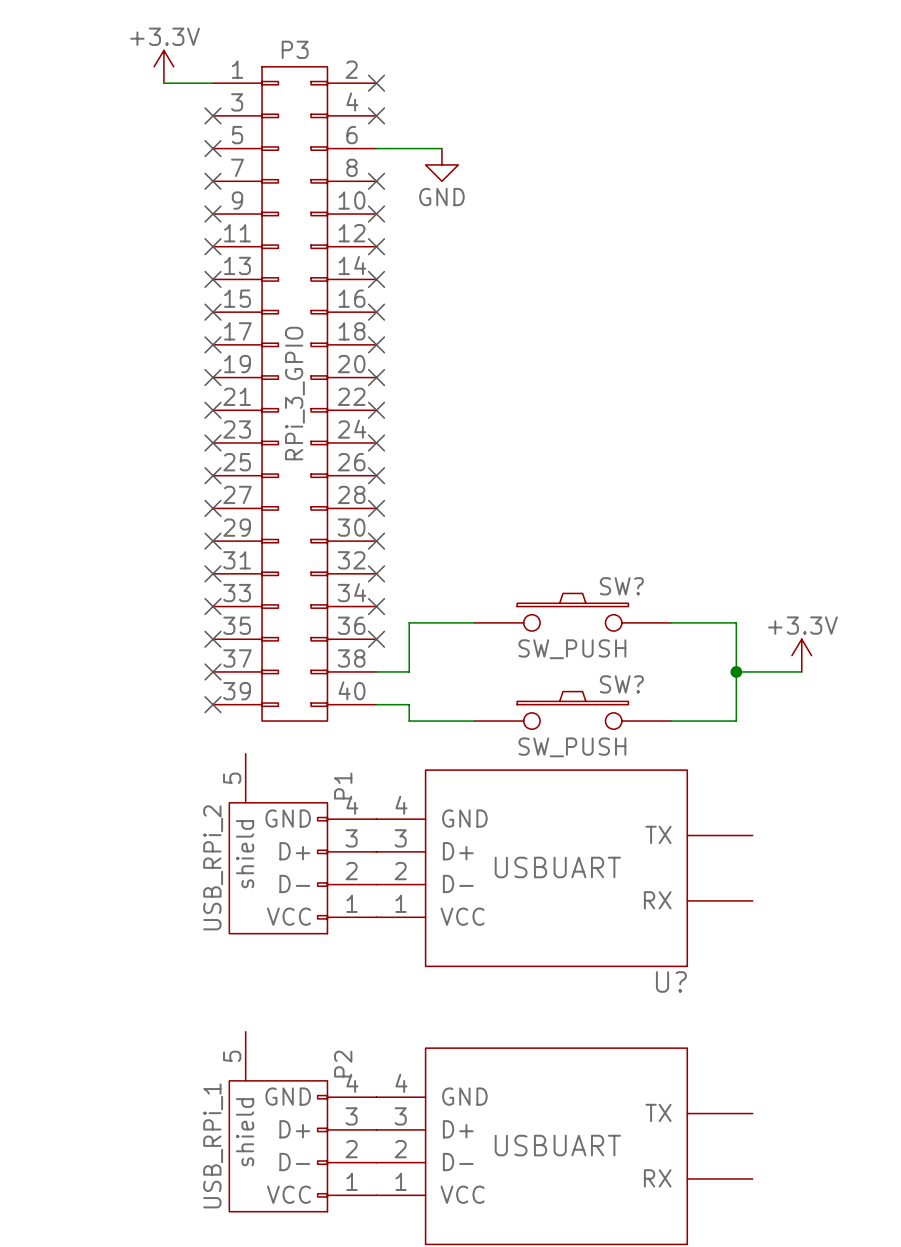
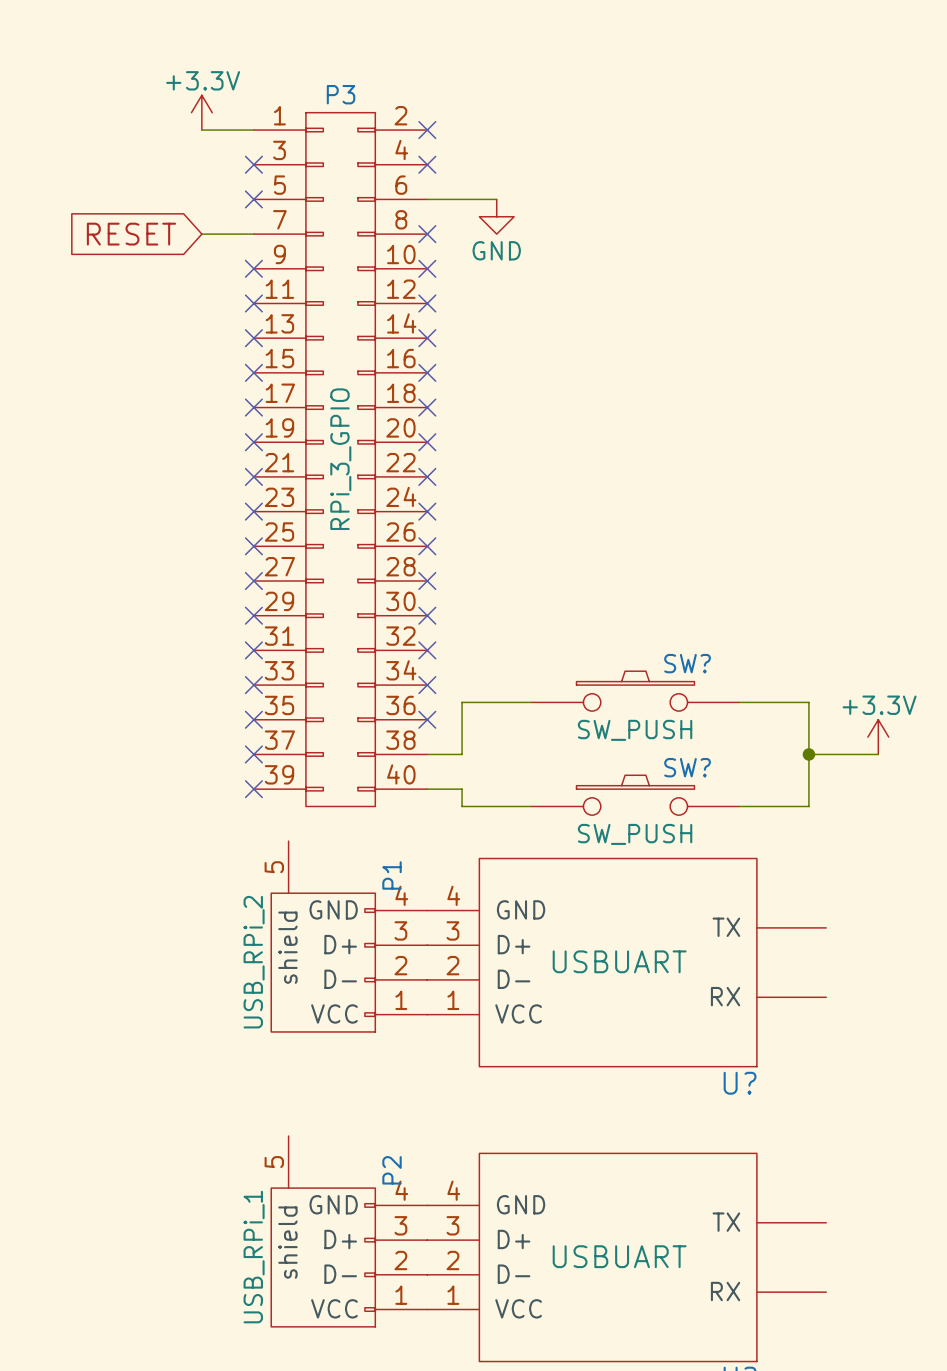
global label: none -> RESET (131, 234)
wire: none -> (201, 234) (253, 234)
no-connect mark: (212, 181) -> none

